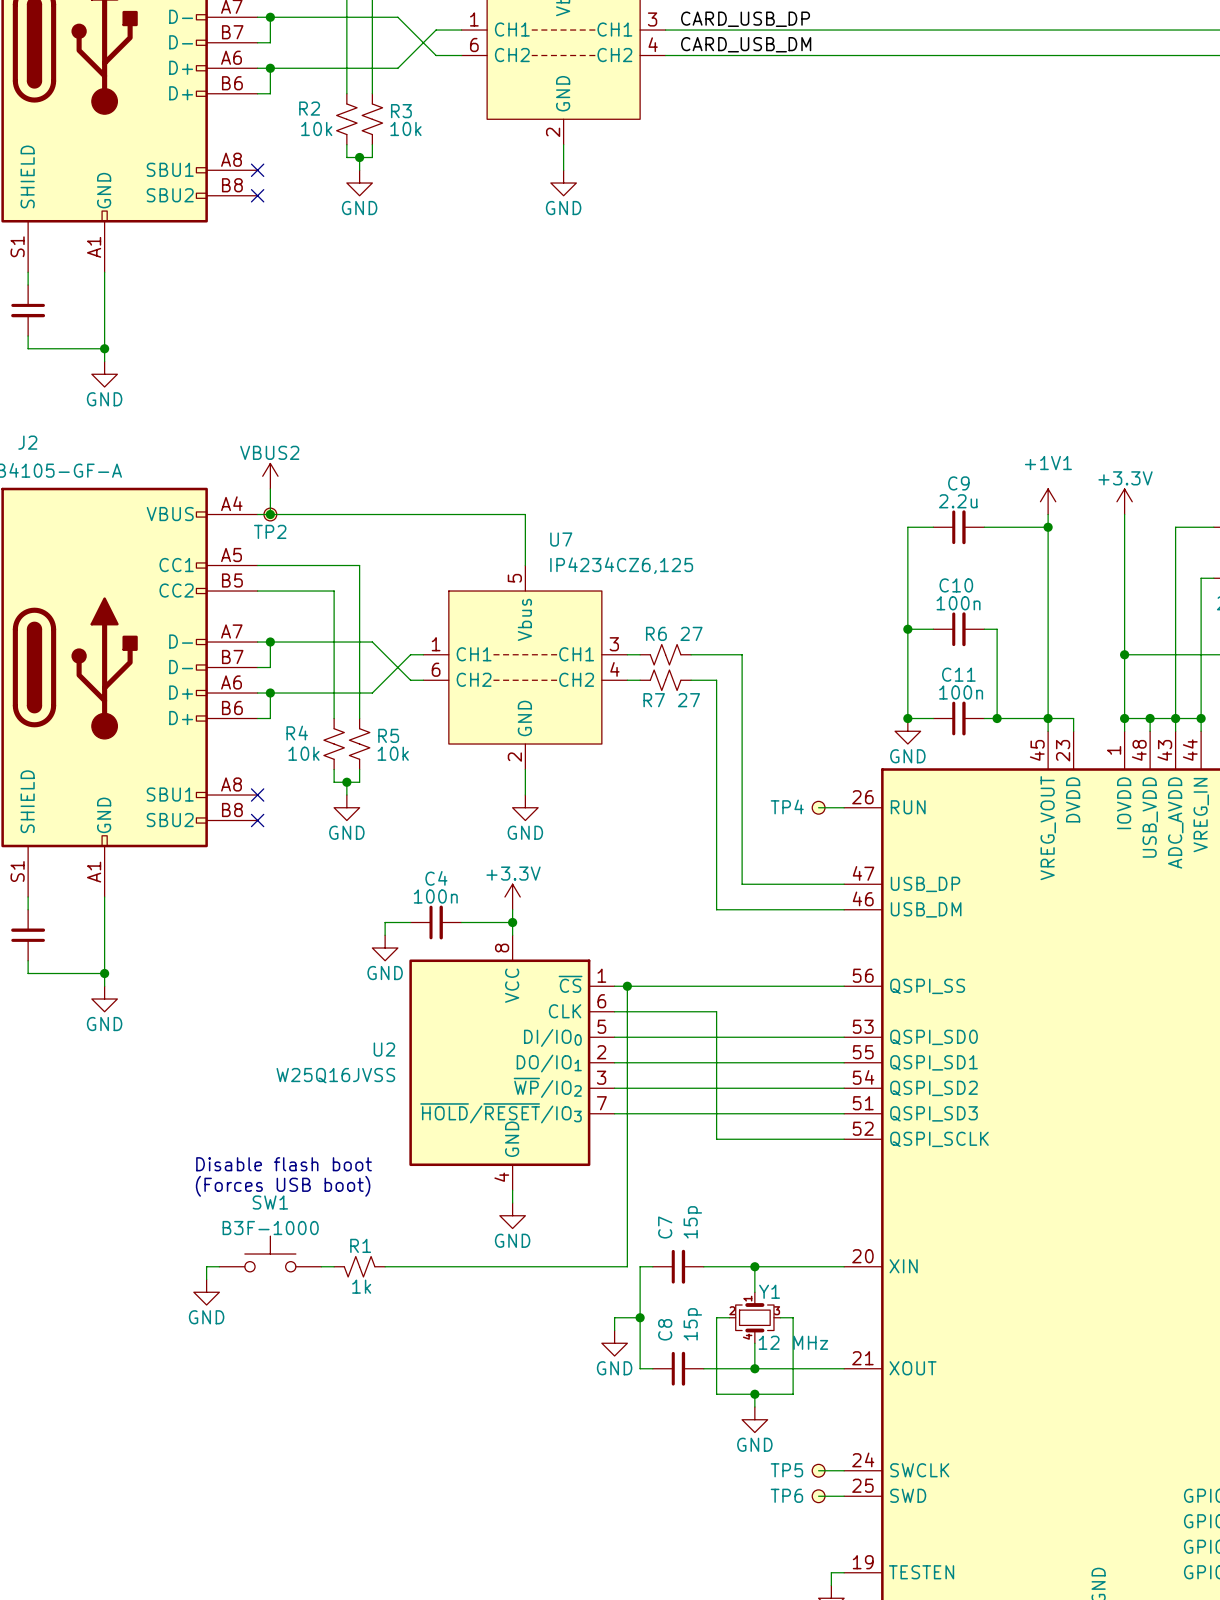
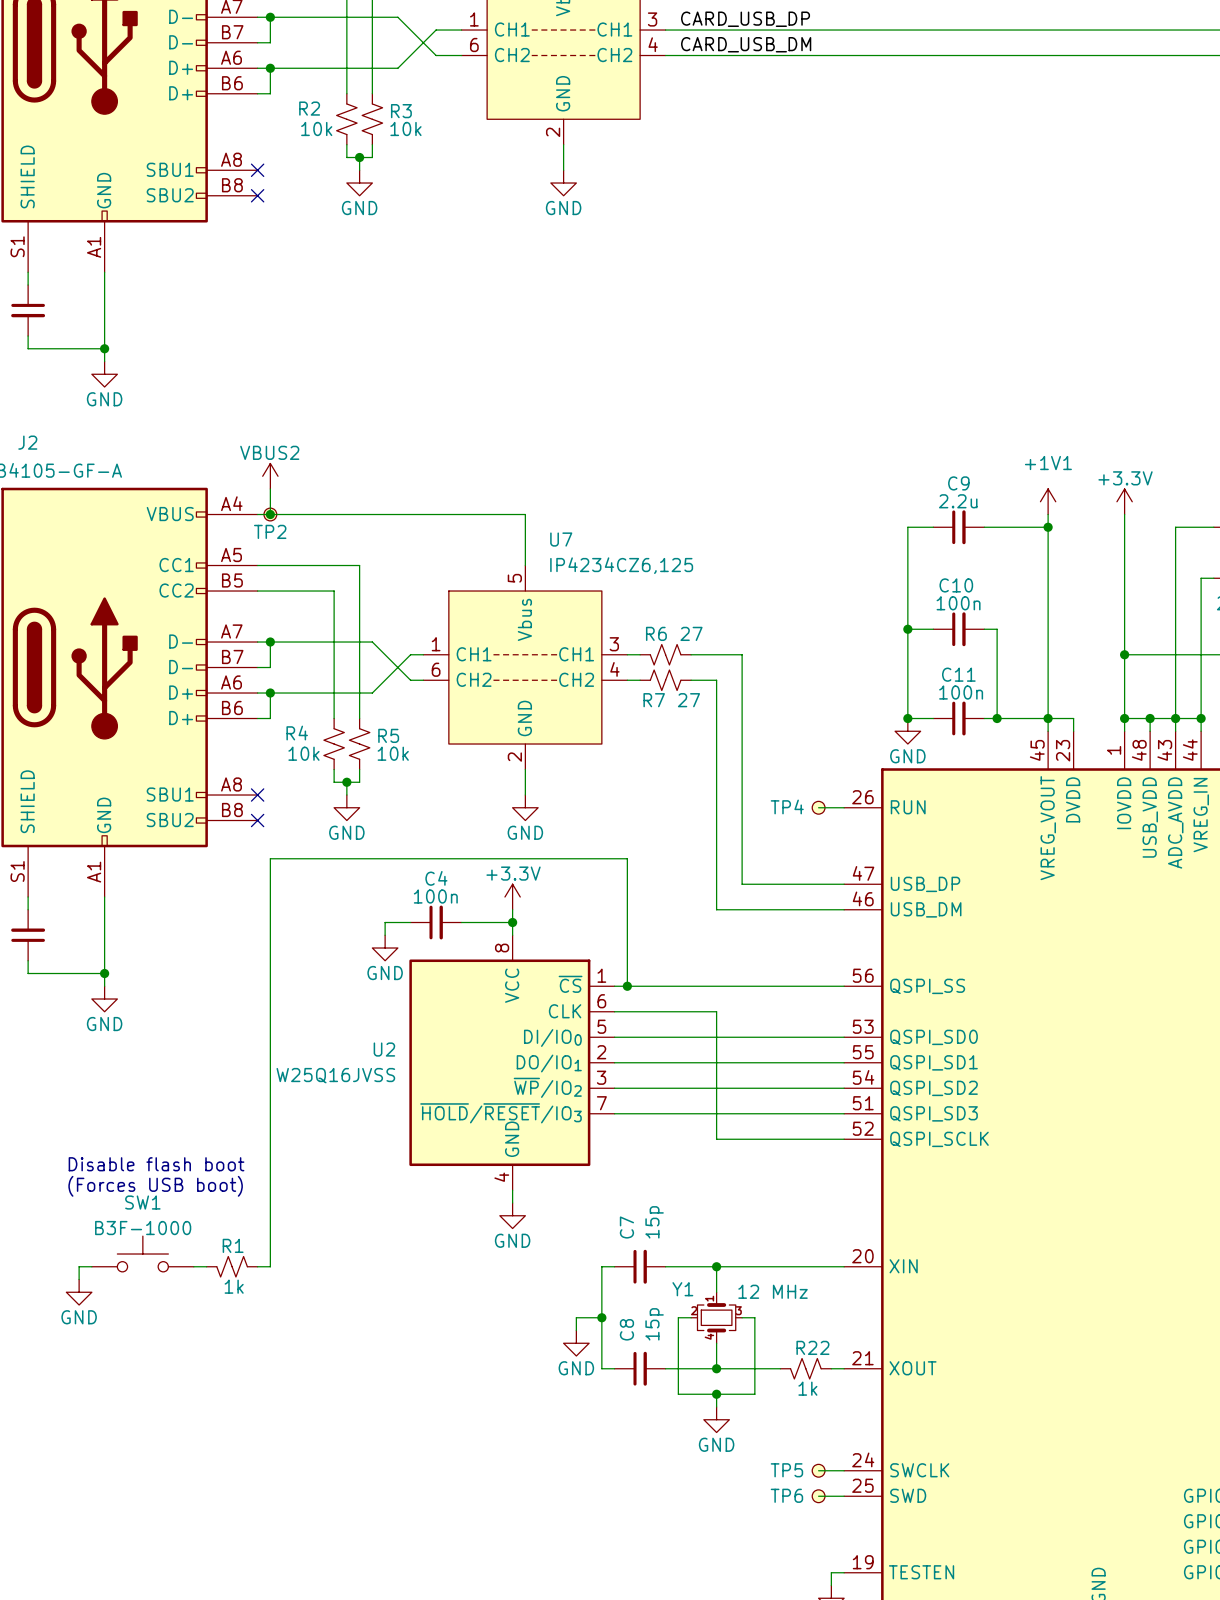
wire: (627, 986) (627, 1266) (614, 1266) -> (627, 986) (627, 858) (270, 858) (270, 1266) (257, 1266)
text position: Disable flash boot (284, 1164) -> Disable flash boot (156, 1164)
text position: (Forces USB boot) (283, 1186) -> (Forces USB boot) (155, 1186)
SW1 position: (270, 1254) -> (142, 1254)
wire: (219, 1266) (206, 1266) (206, 1279) -> (91, 1266) (79, 1266) (79, 1279)
wire: (321, 1266) (334, 1266) -> (193, 1266) (206, 1266)
R1 position: (359, 1266) -> (232, 1266)
wire: (385, 1266) (601, 1266) -> (614, 1368) (601, 1368) (601, 1266)
wire: (652, 1266) (640, 1266) (640, 1368) (652, 1368) -> none
C7 position: (678, 1266) -> (640, 1266)
wire: (754, 1266) (754, 1292) -> (716, 1266) (716, 1292)
junction position: (754, 1266) -> (716, 1266)
Y1 name position: Y1 (769, 1291) -> Y1 (682, 1289)
power symbol position: GND (206, 1292) -> GND (79, 1292)
wire: (640, 1317) (614, 1317) (614, 1330) -> (601, 1317) (576, 1317) (576, 1330)
junction position: (640, 1317) -> (601, 1317)
wire: none -> (691, 1317) (678, 1317) (678, 1394) (716, 1394) (716, 1407)
wire: (729, 1317) (716, 1317) (716, 1343) -> none
wire: none -> (742, 1317) (754, 1317) (754, 1343)
Y1 position: (754, 1317) -> (716, 1317)
wire: (780, 1317) (793, 1317) (793, 1394) (754, 1394) (754, 1407) -> none
Y1 value position: 12 MHz (793, 1342) -> 12 MHz (773, 1291)
power symbol position: GND (614, 1343) -> GND (576, 1343)
C8 position: (678, 1368) -> (640, 1368)
wire: (716, 1368) (716, 1394) -> (754, 1368) (754, 1394)
junction: none -> (716, 1368)
junction: (754, 1368) -> none
R22: none -> 1k (805, 1368)
junction: none -> (716, 1394)
junction: (754, 1394) -> none
power symbol position: GND (754, 1419) -> GND (716, 1419)

